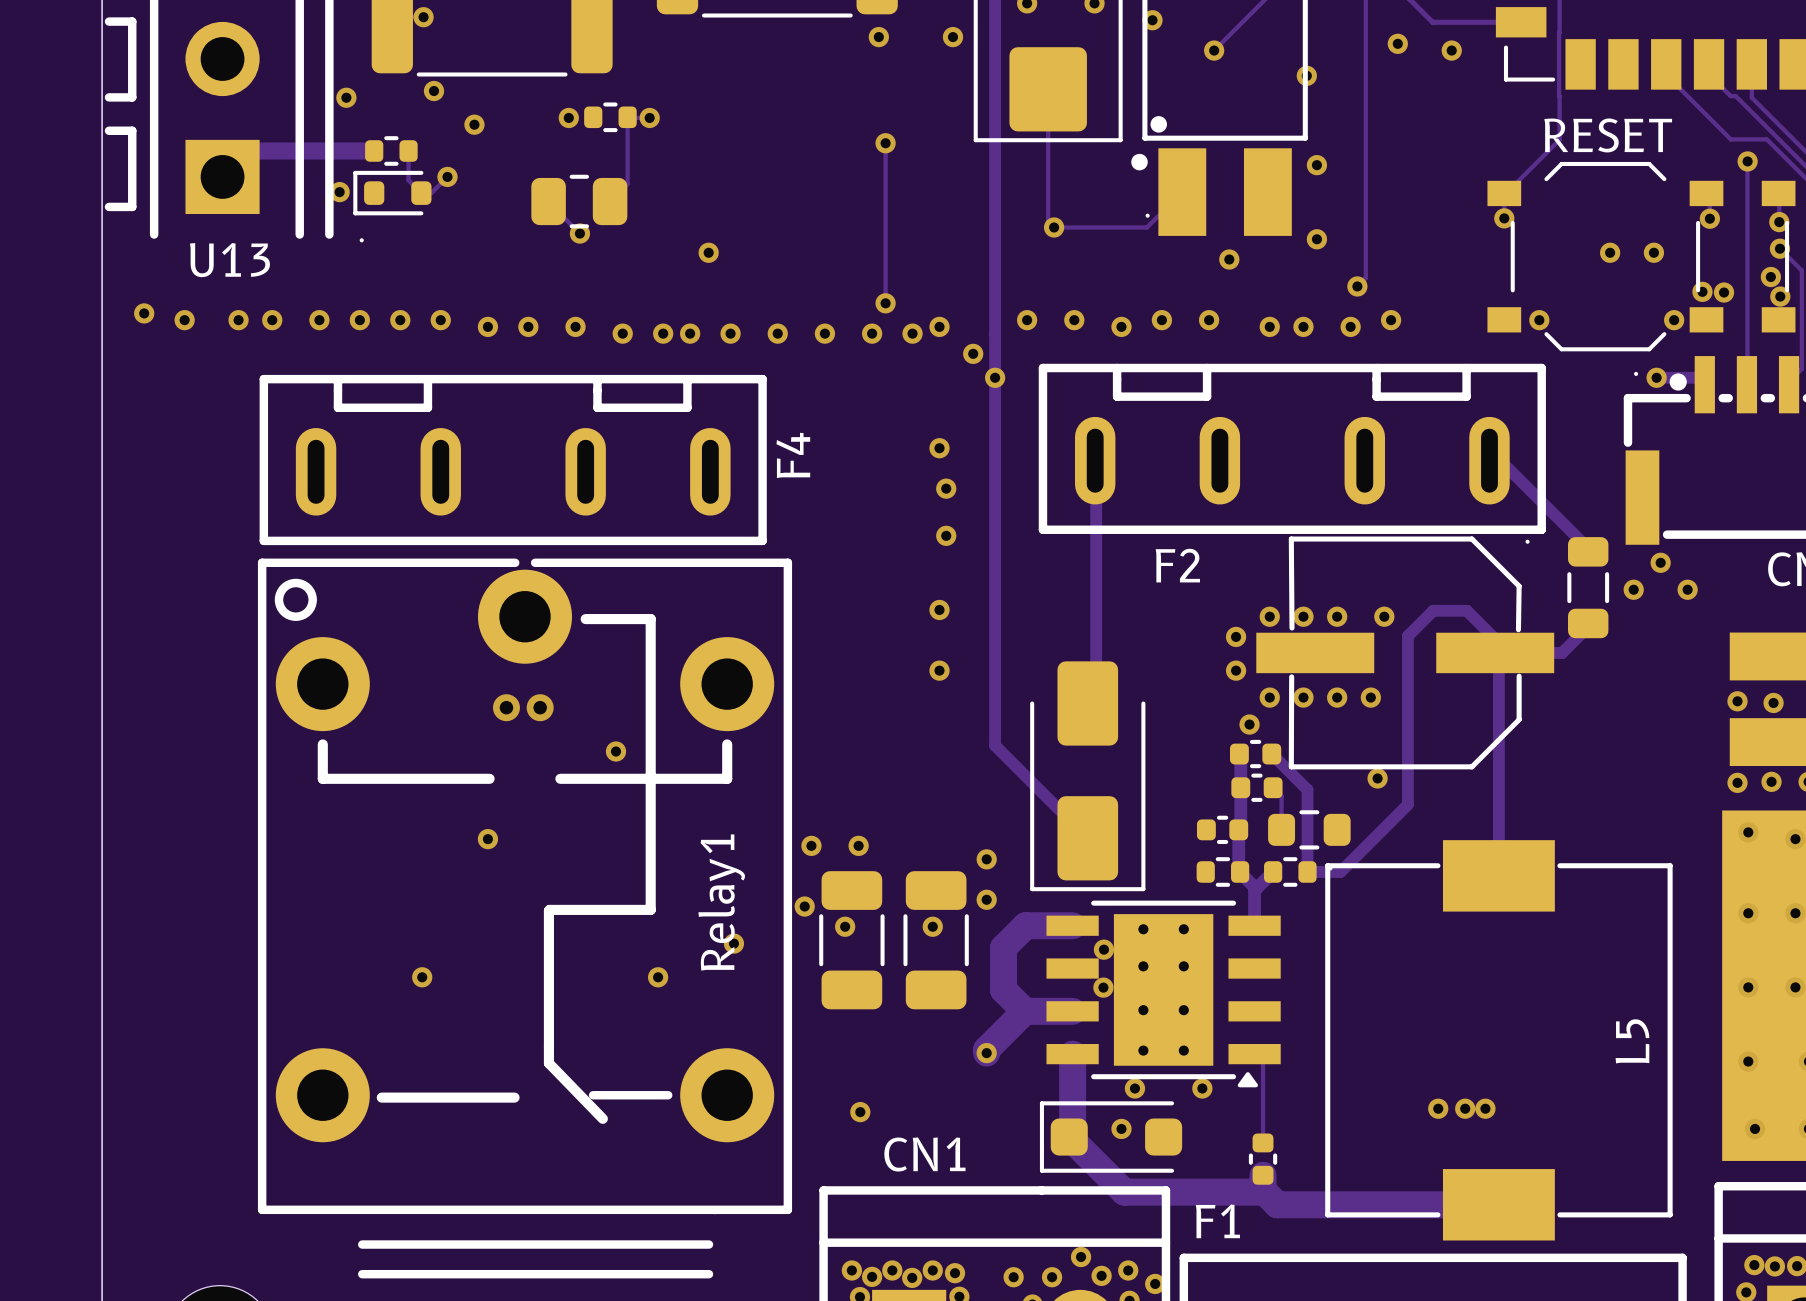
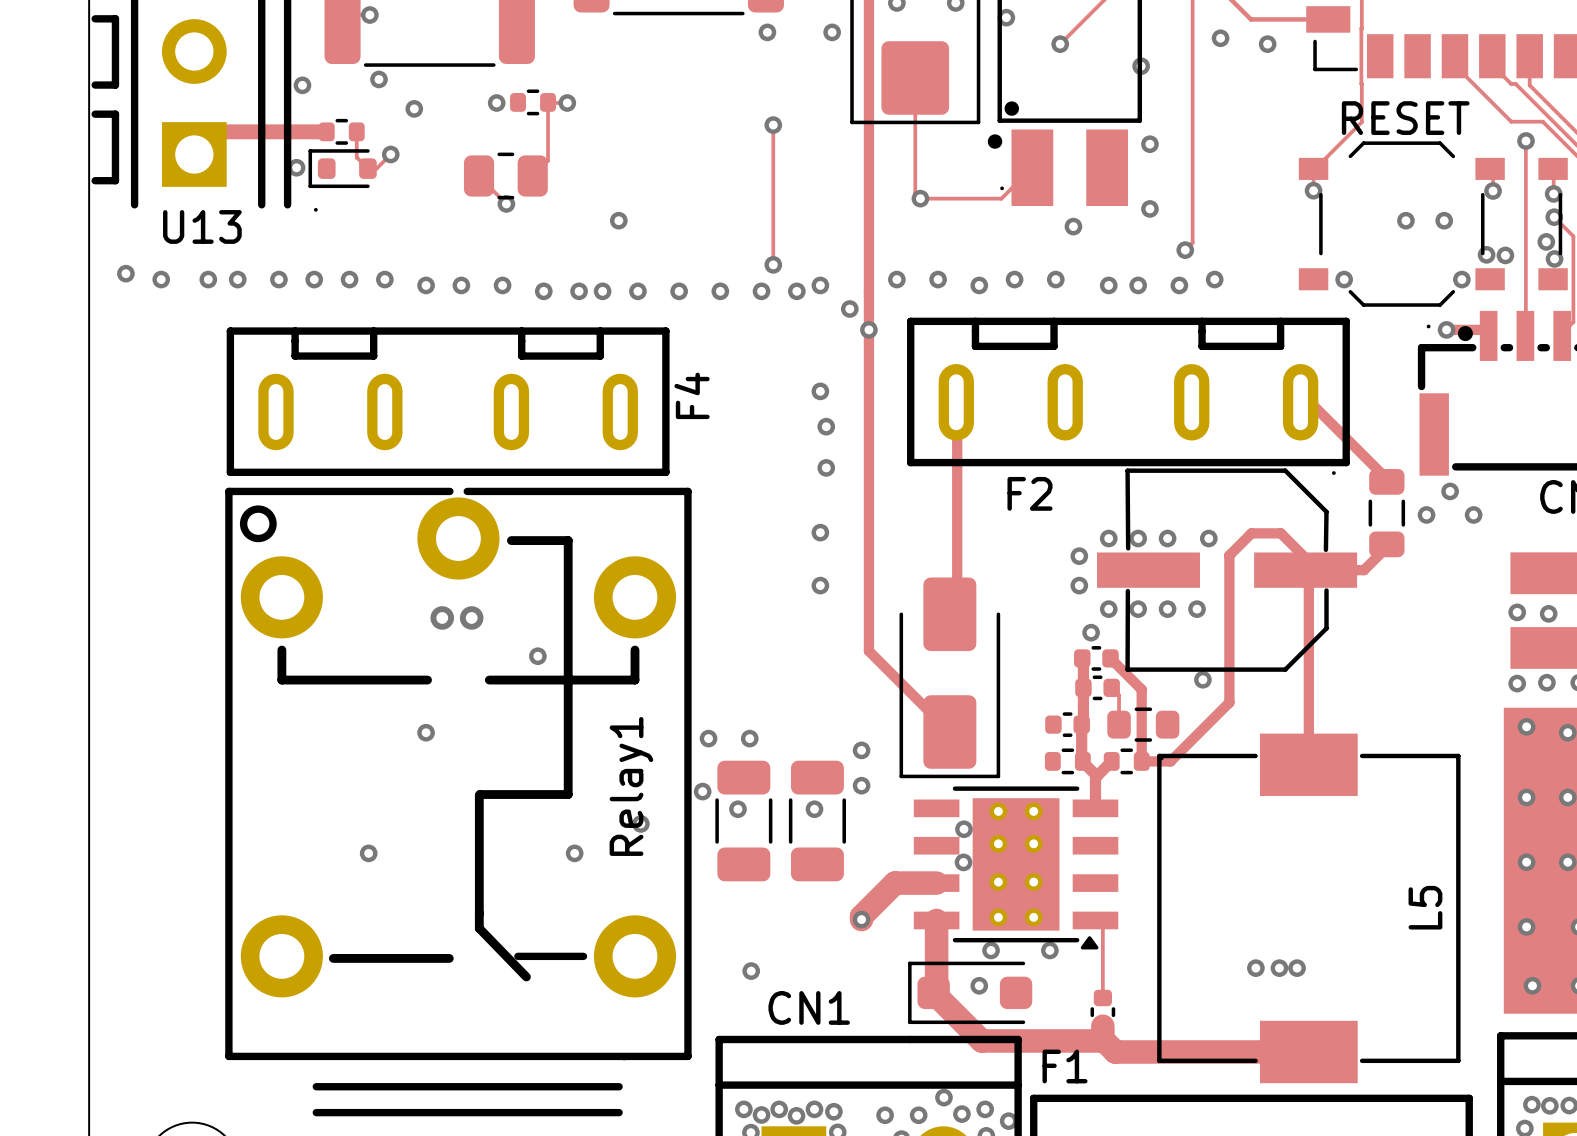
track: (1072, 925) (1025, 925) (1003, 947) (1003, 989) (1024, 1011) -> none

